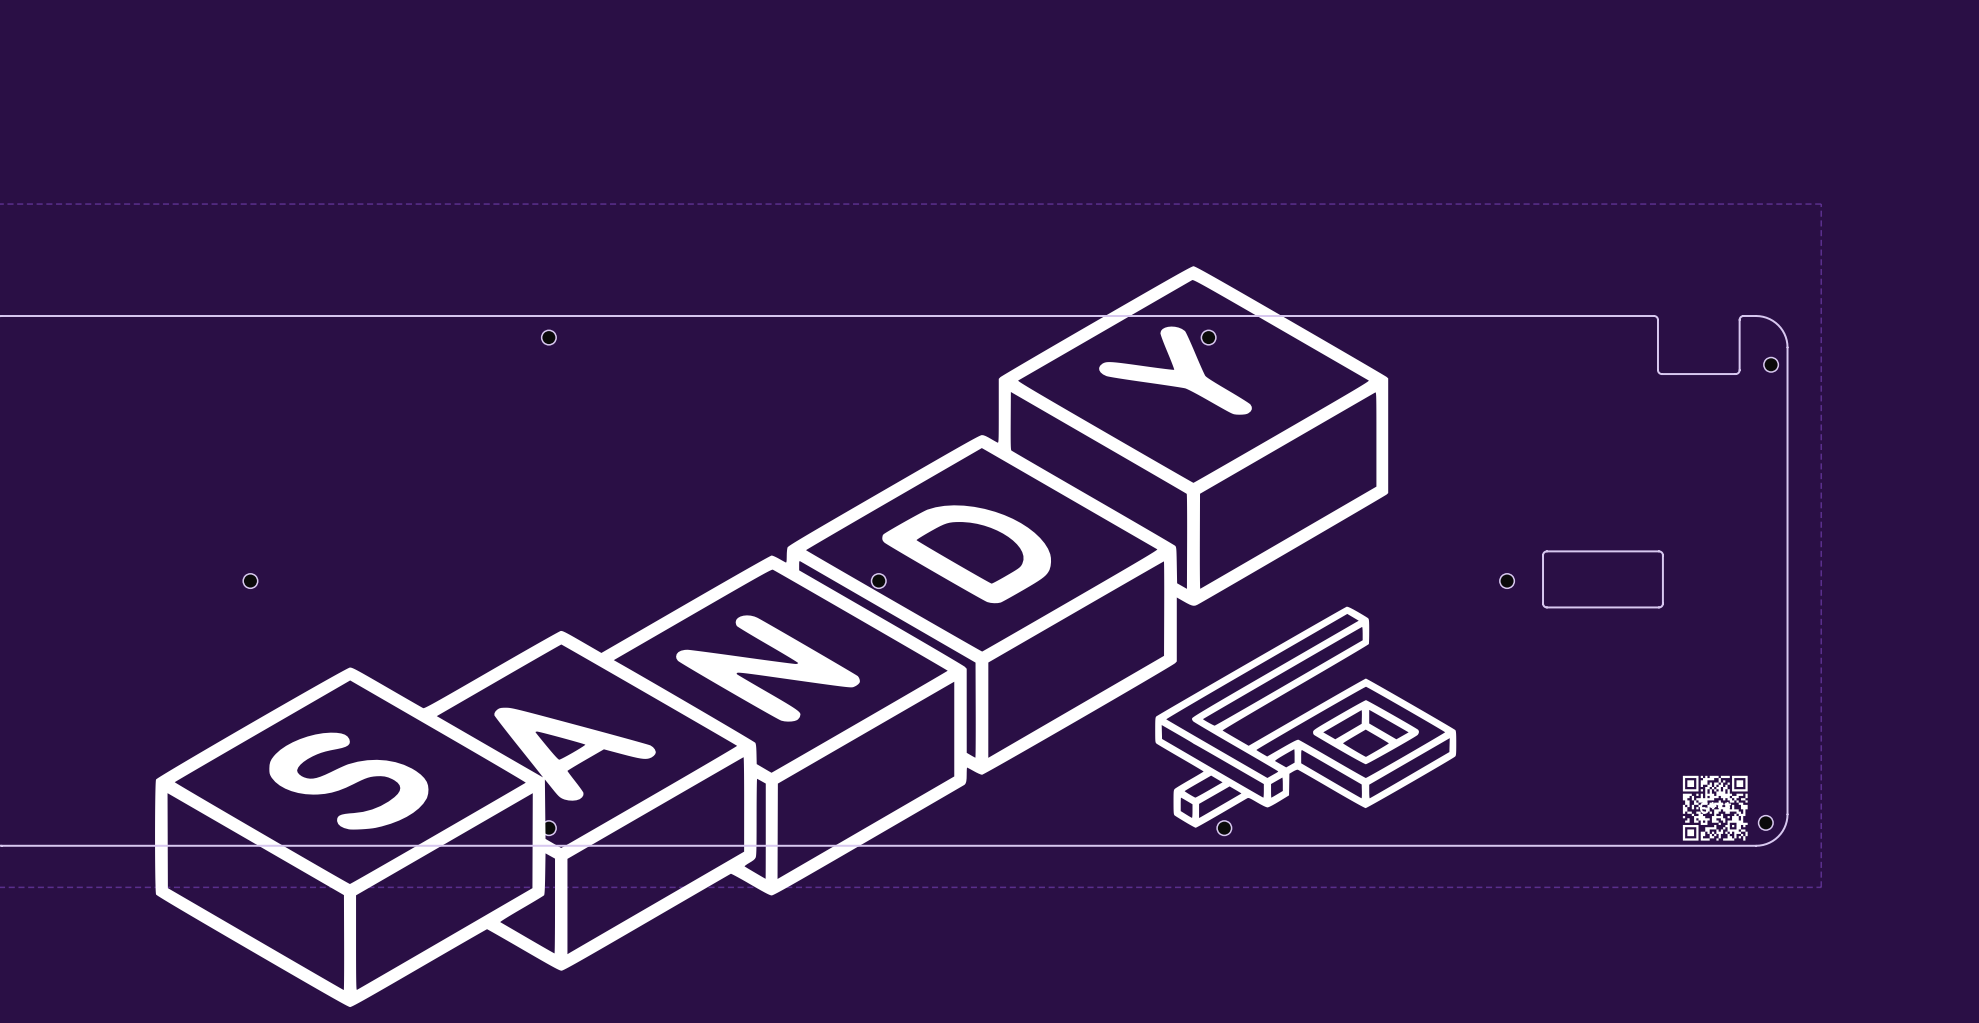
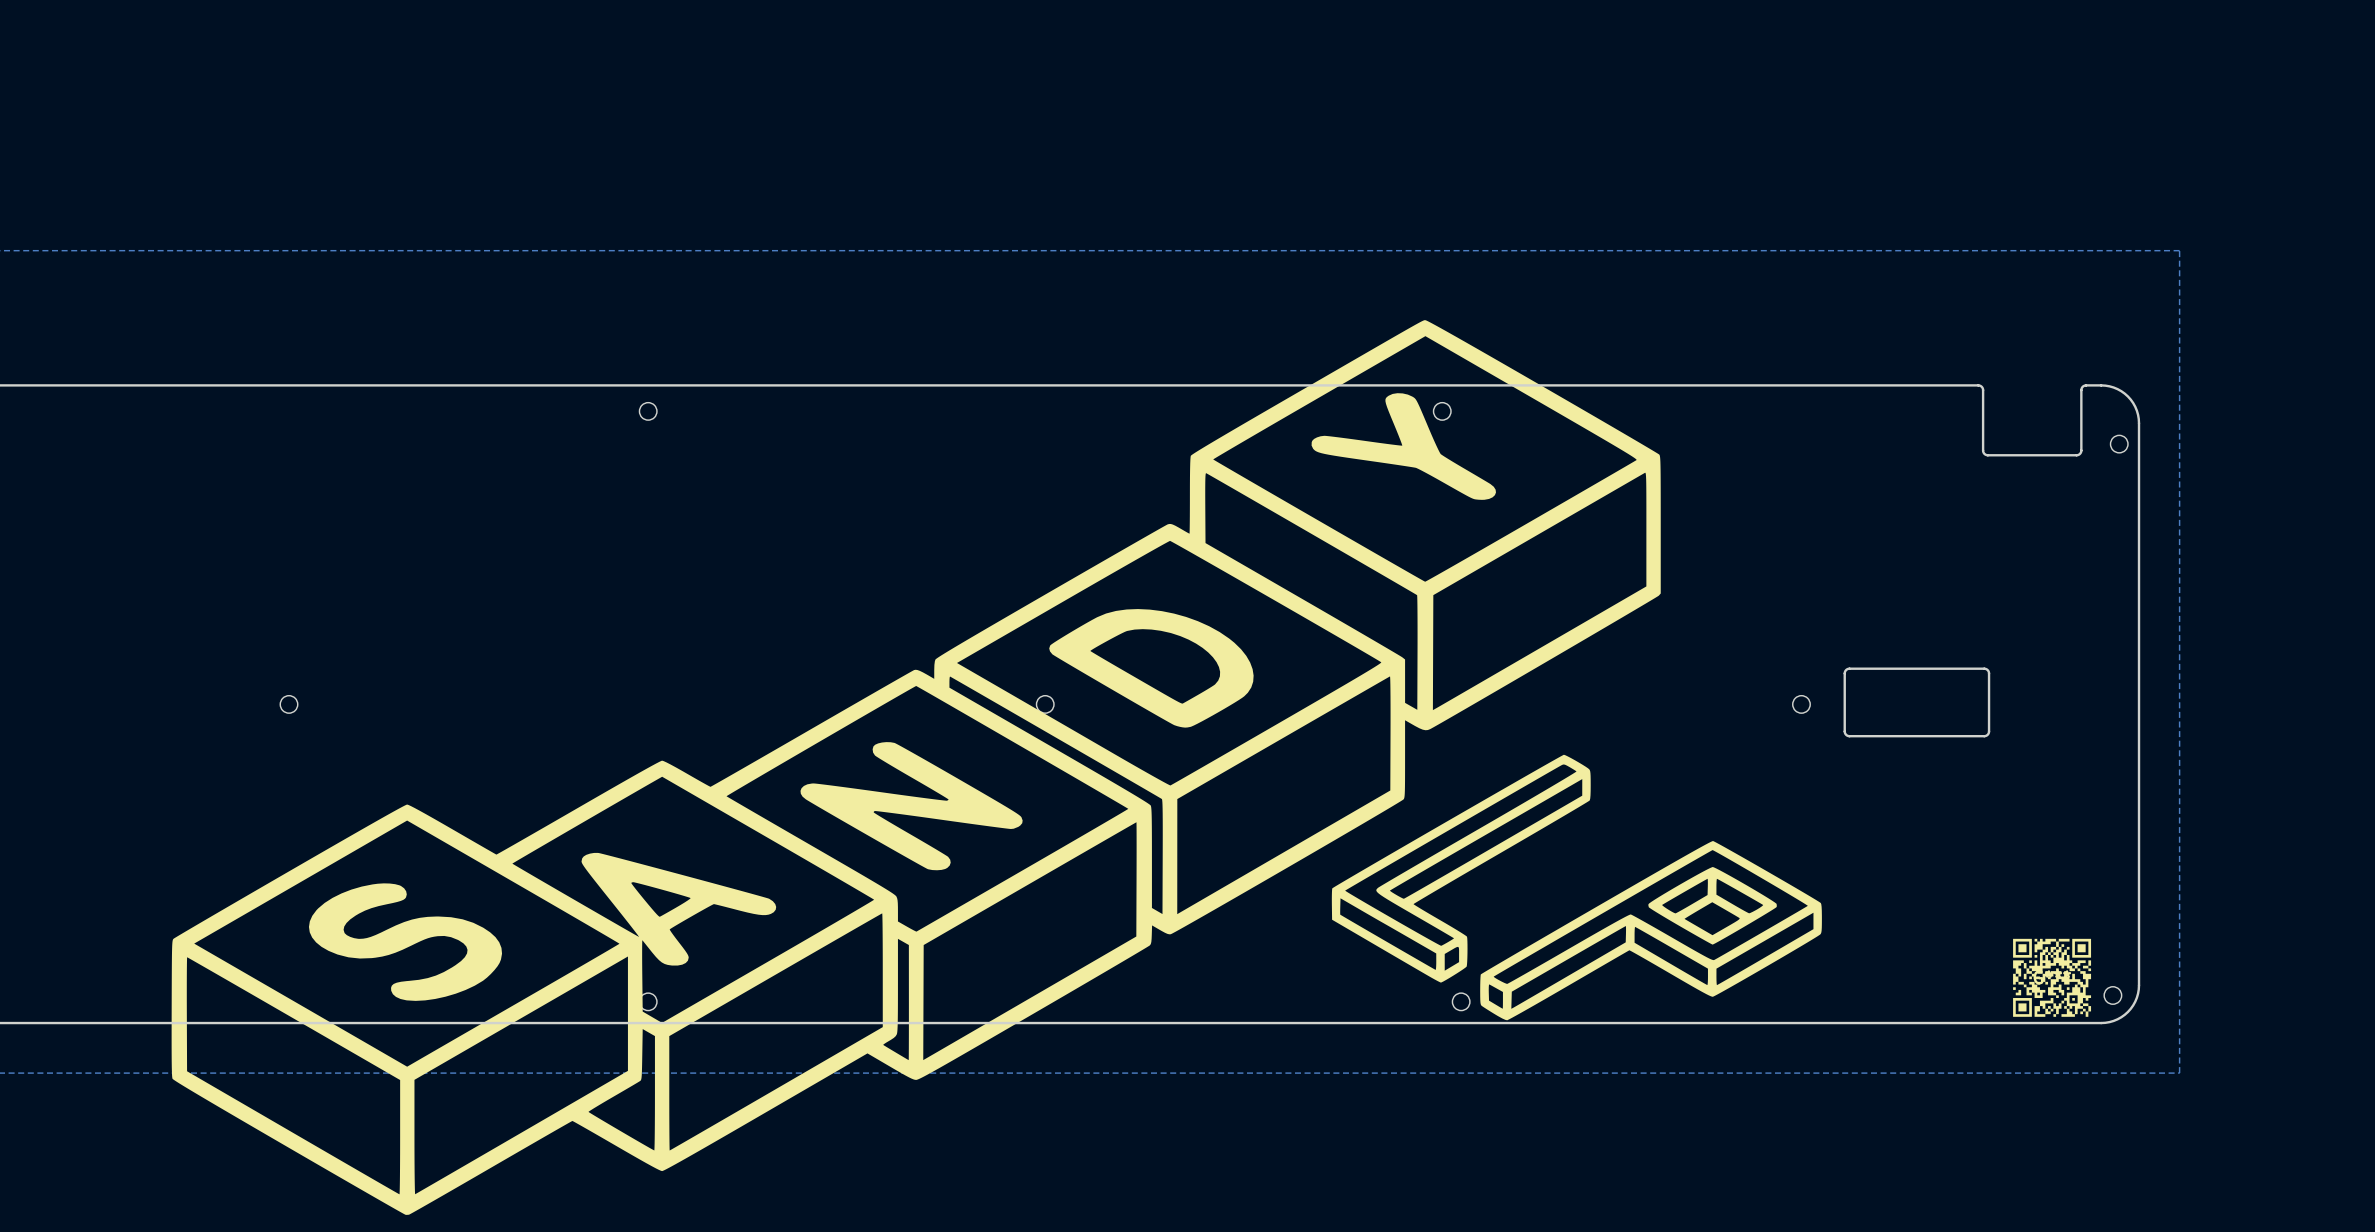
drawing: none -> [171, 320, 1822, 1215]
drawing: [155, 266, 1457, 1008] -> none

